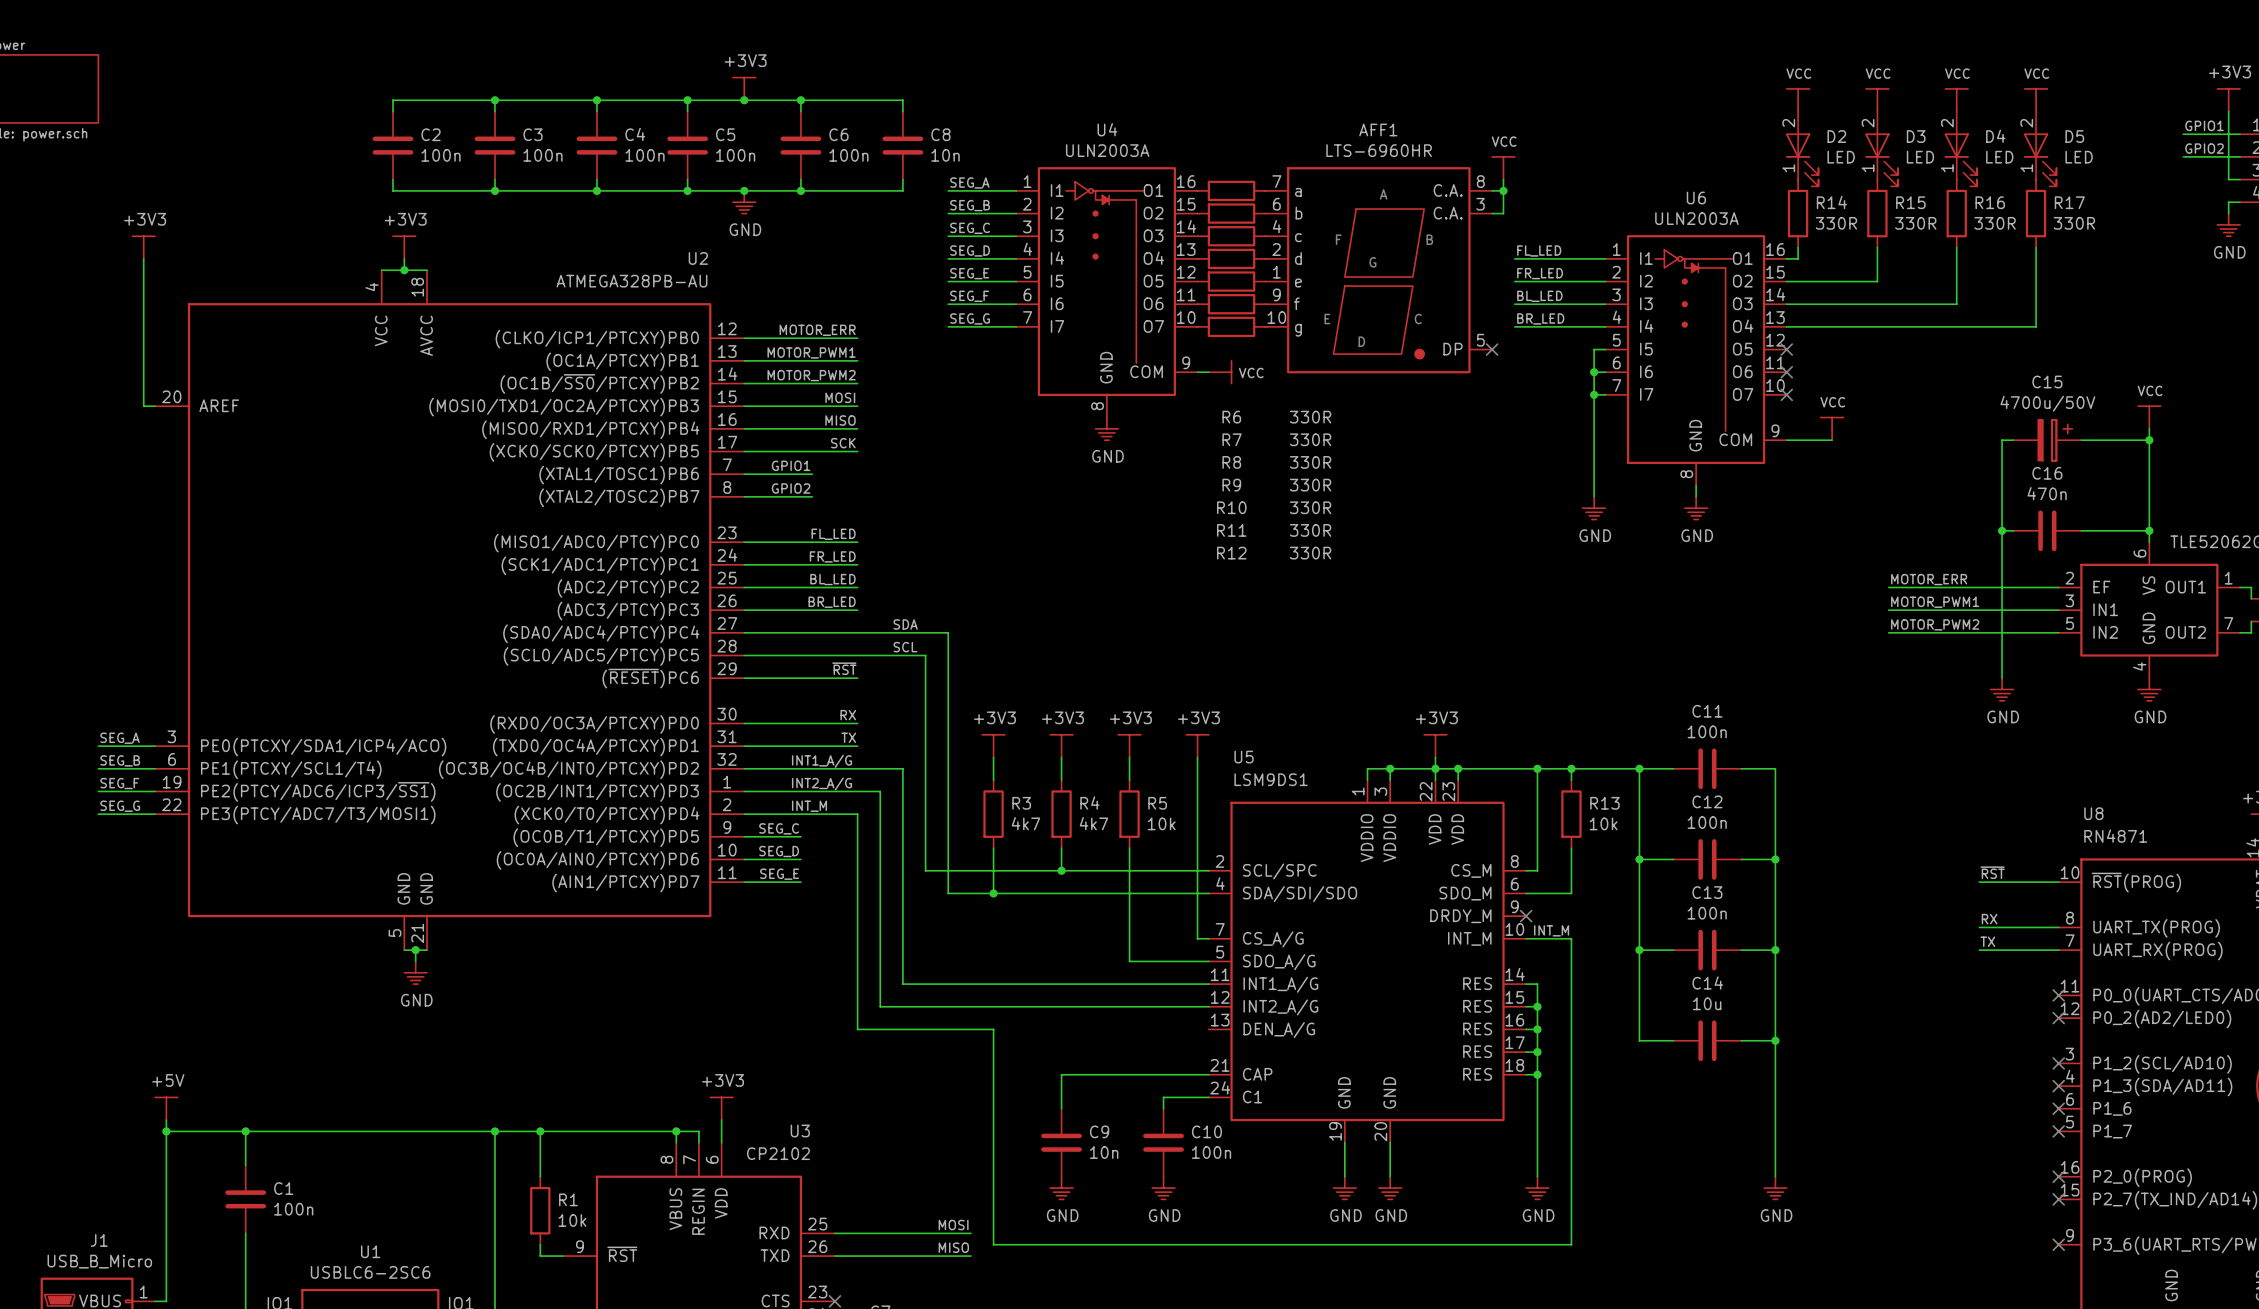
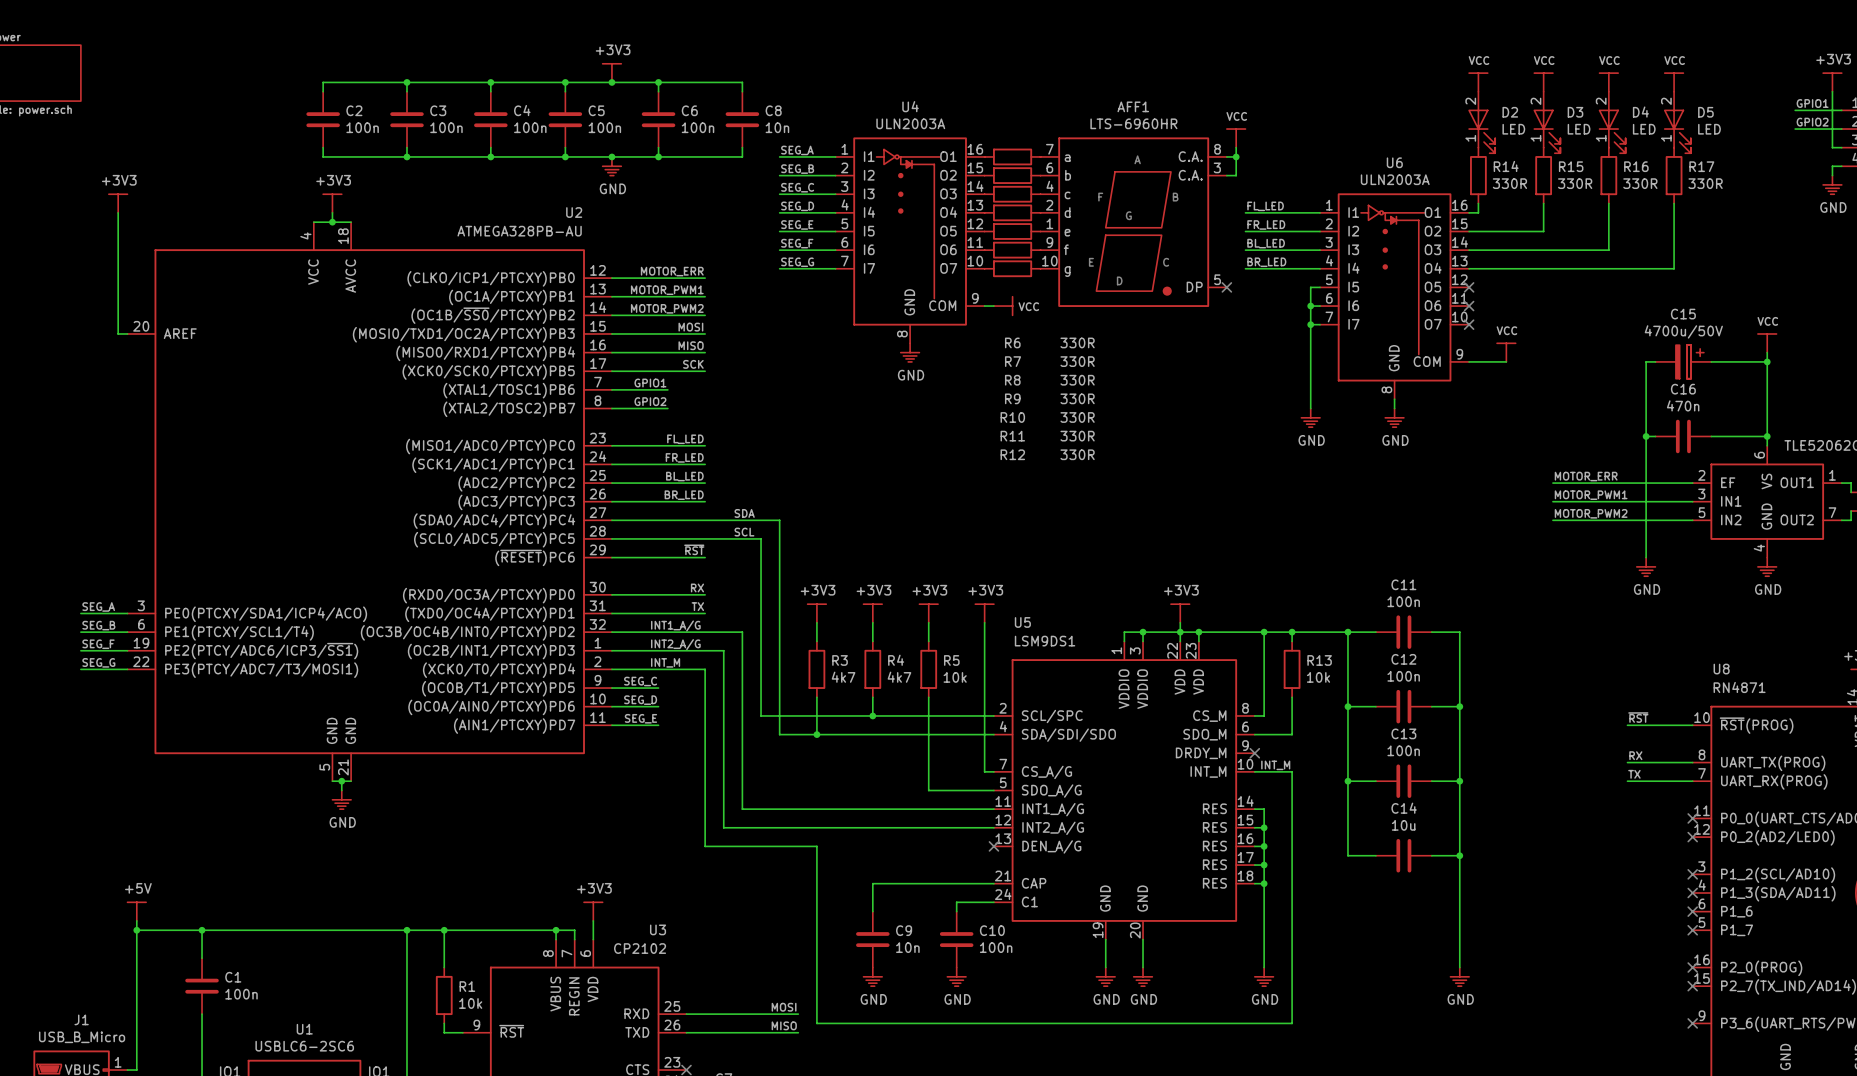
no-connect mark: none -> (993, 846)

